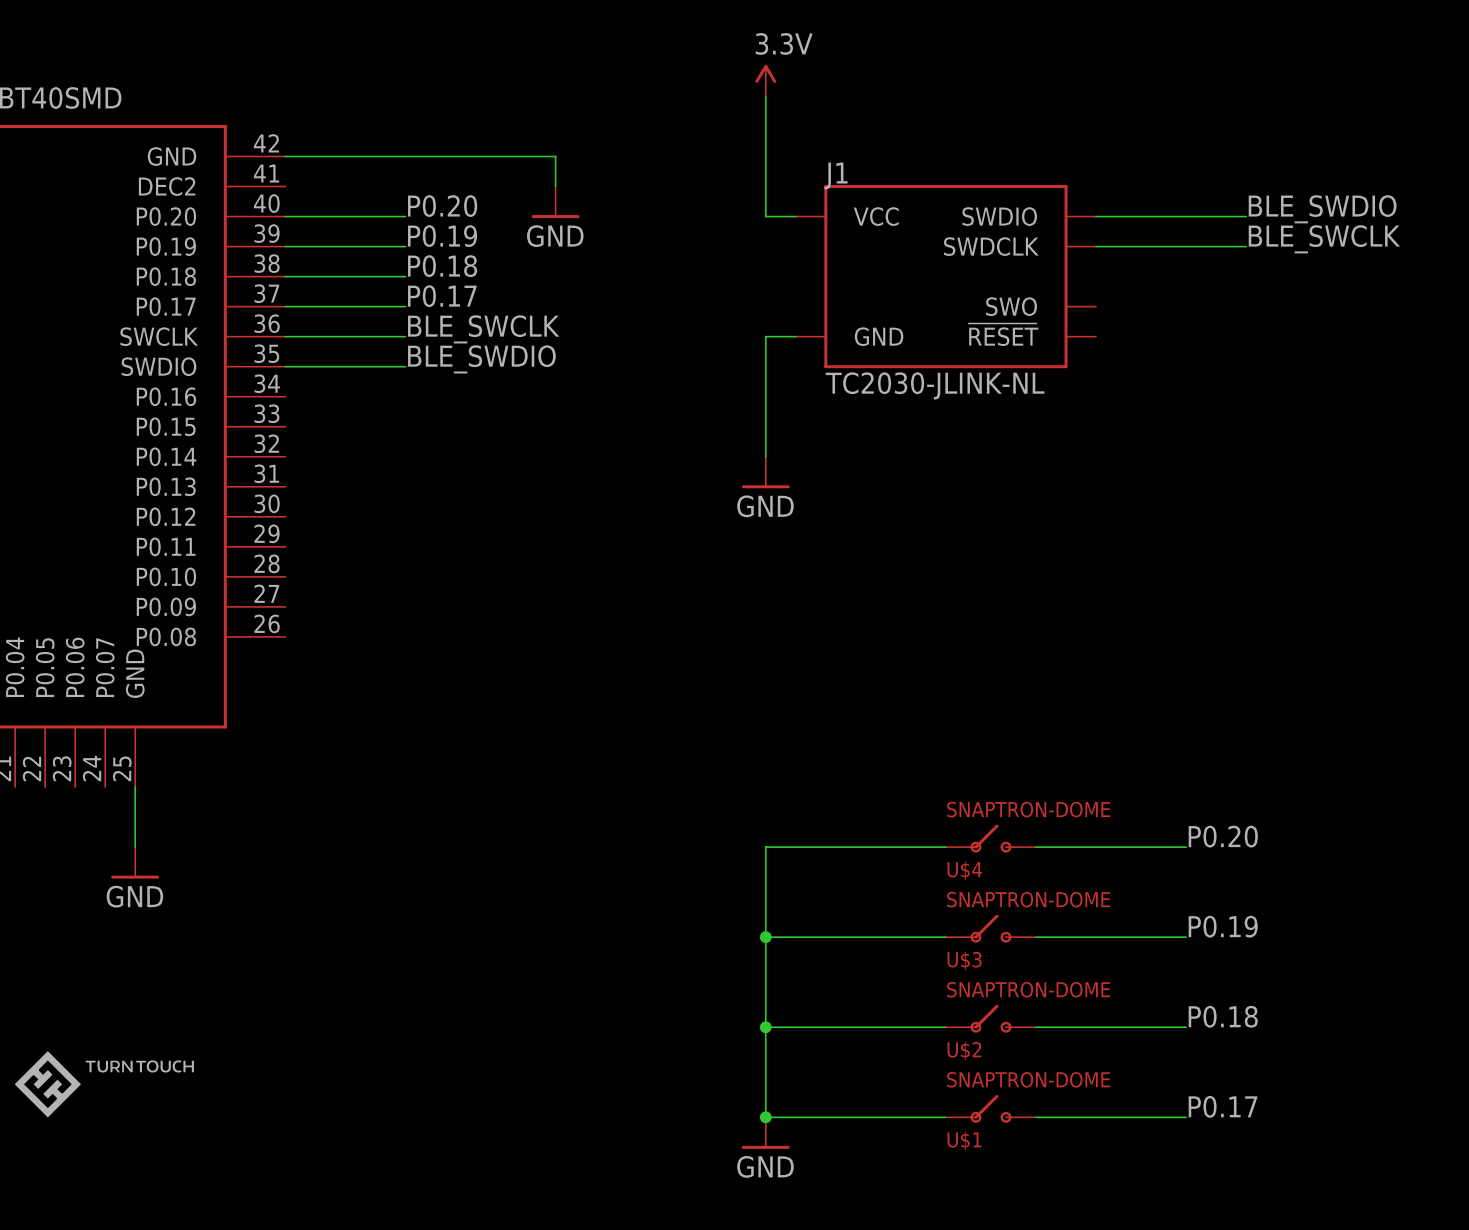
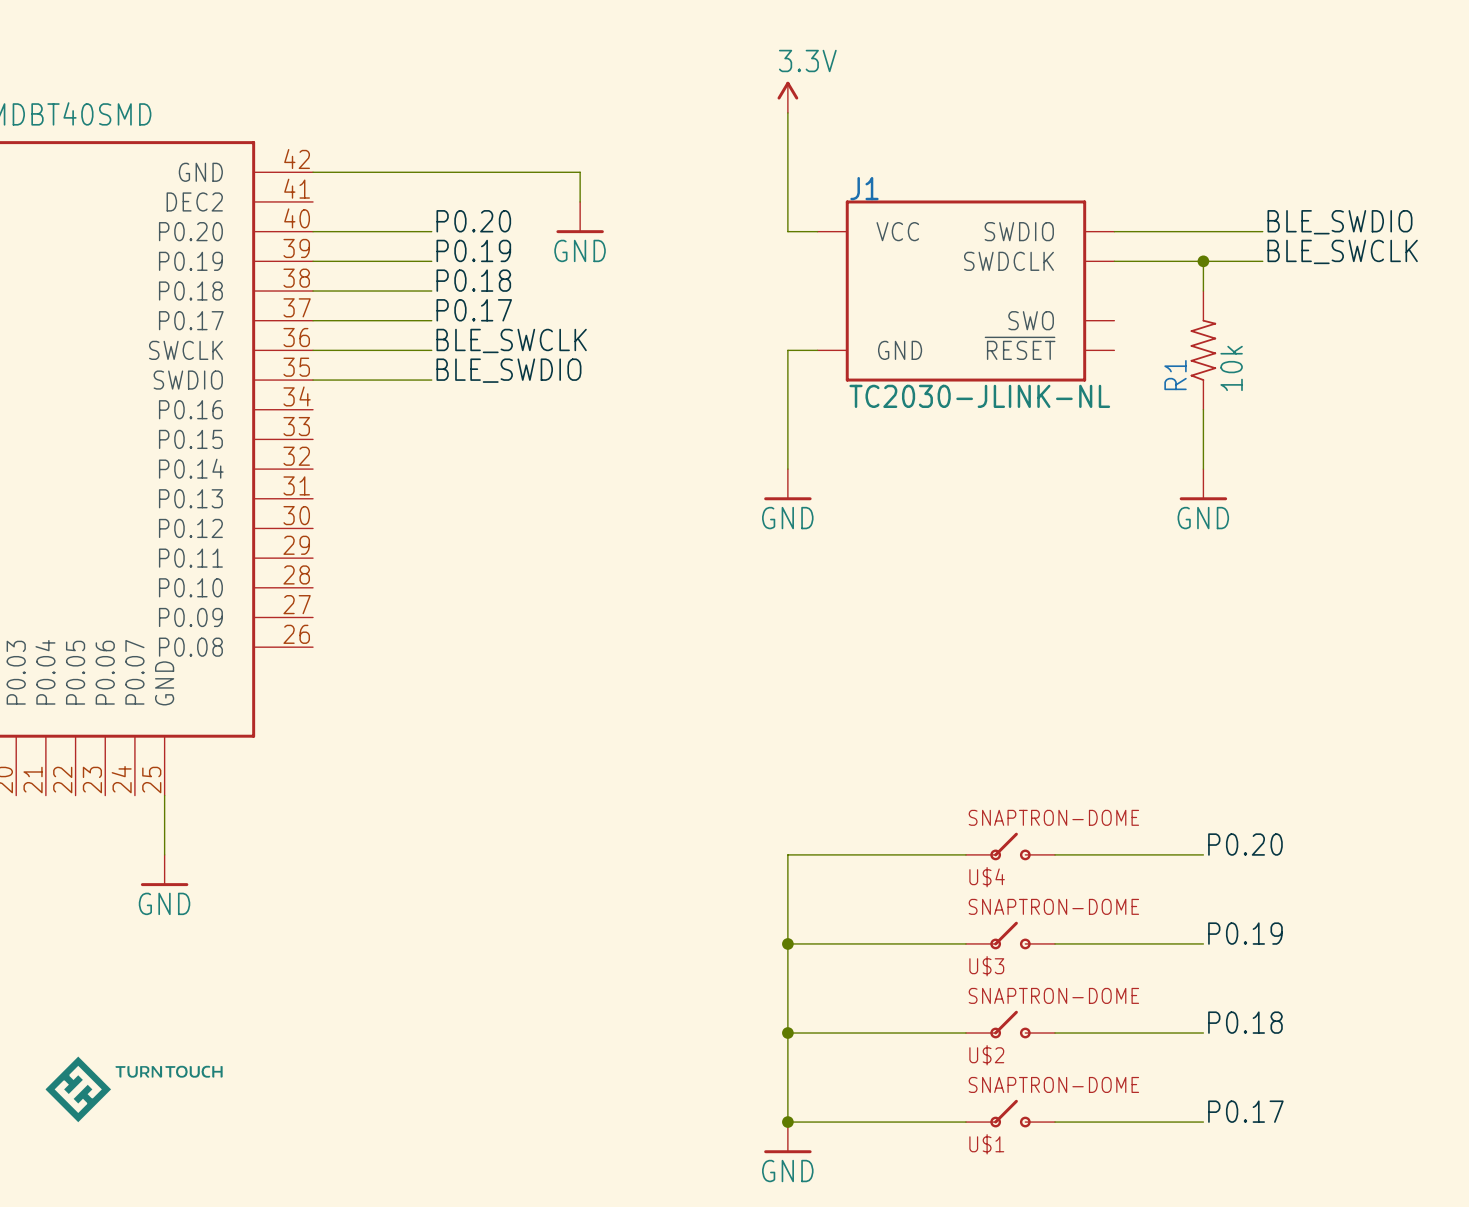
wire: none -> (1203, 261) (1203, 291)
junction: none -> (1203, 261)
R1: none -> 10k (1203, 350)
wire: none -> (1203, 409) (1203, 469)
power symbol: none -> GND (1203, 484)

